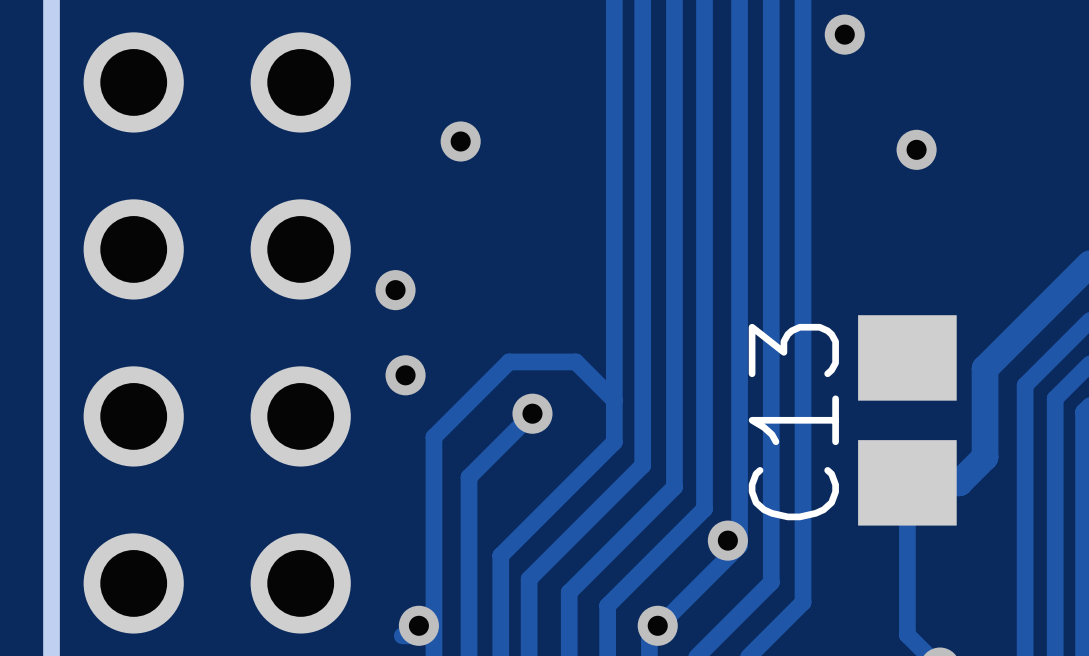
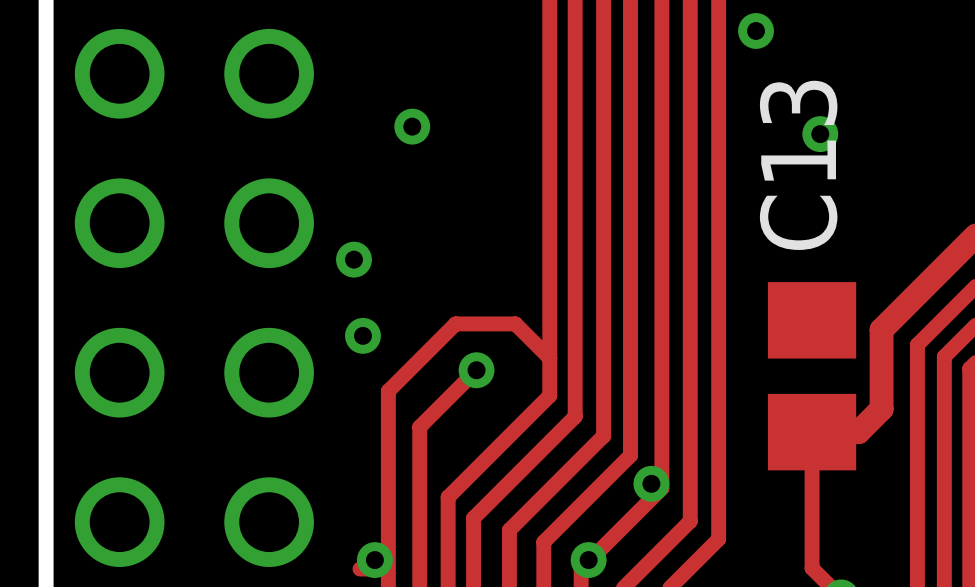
C13 name position: C13 (793, 422) -> C13 (798, 165)

